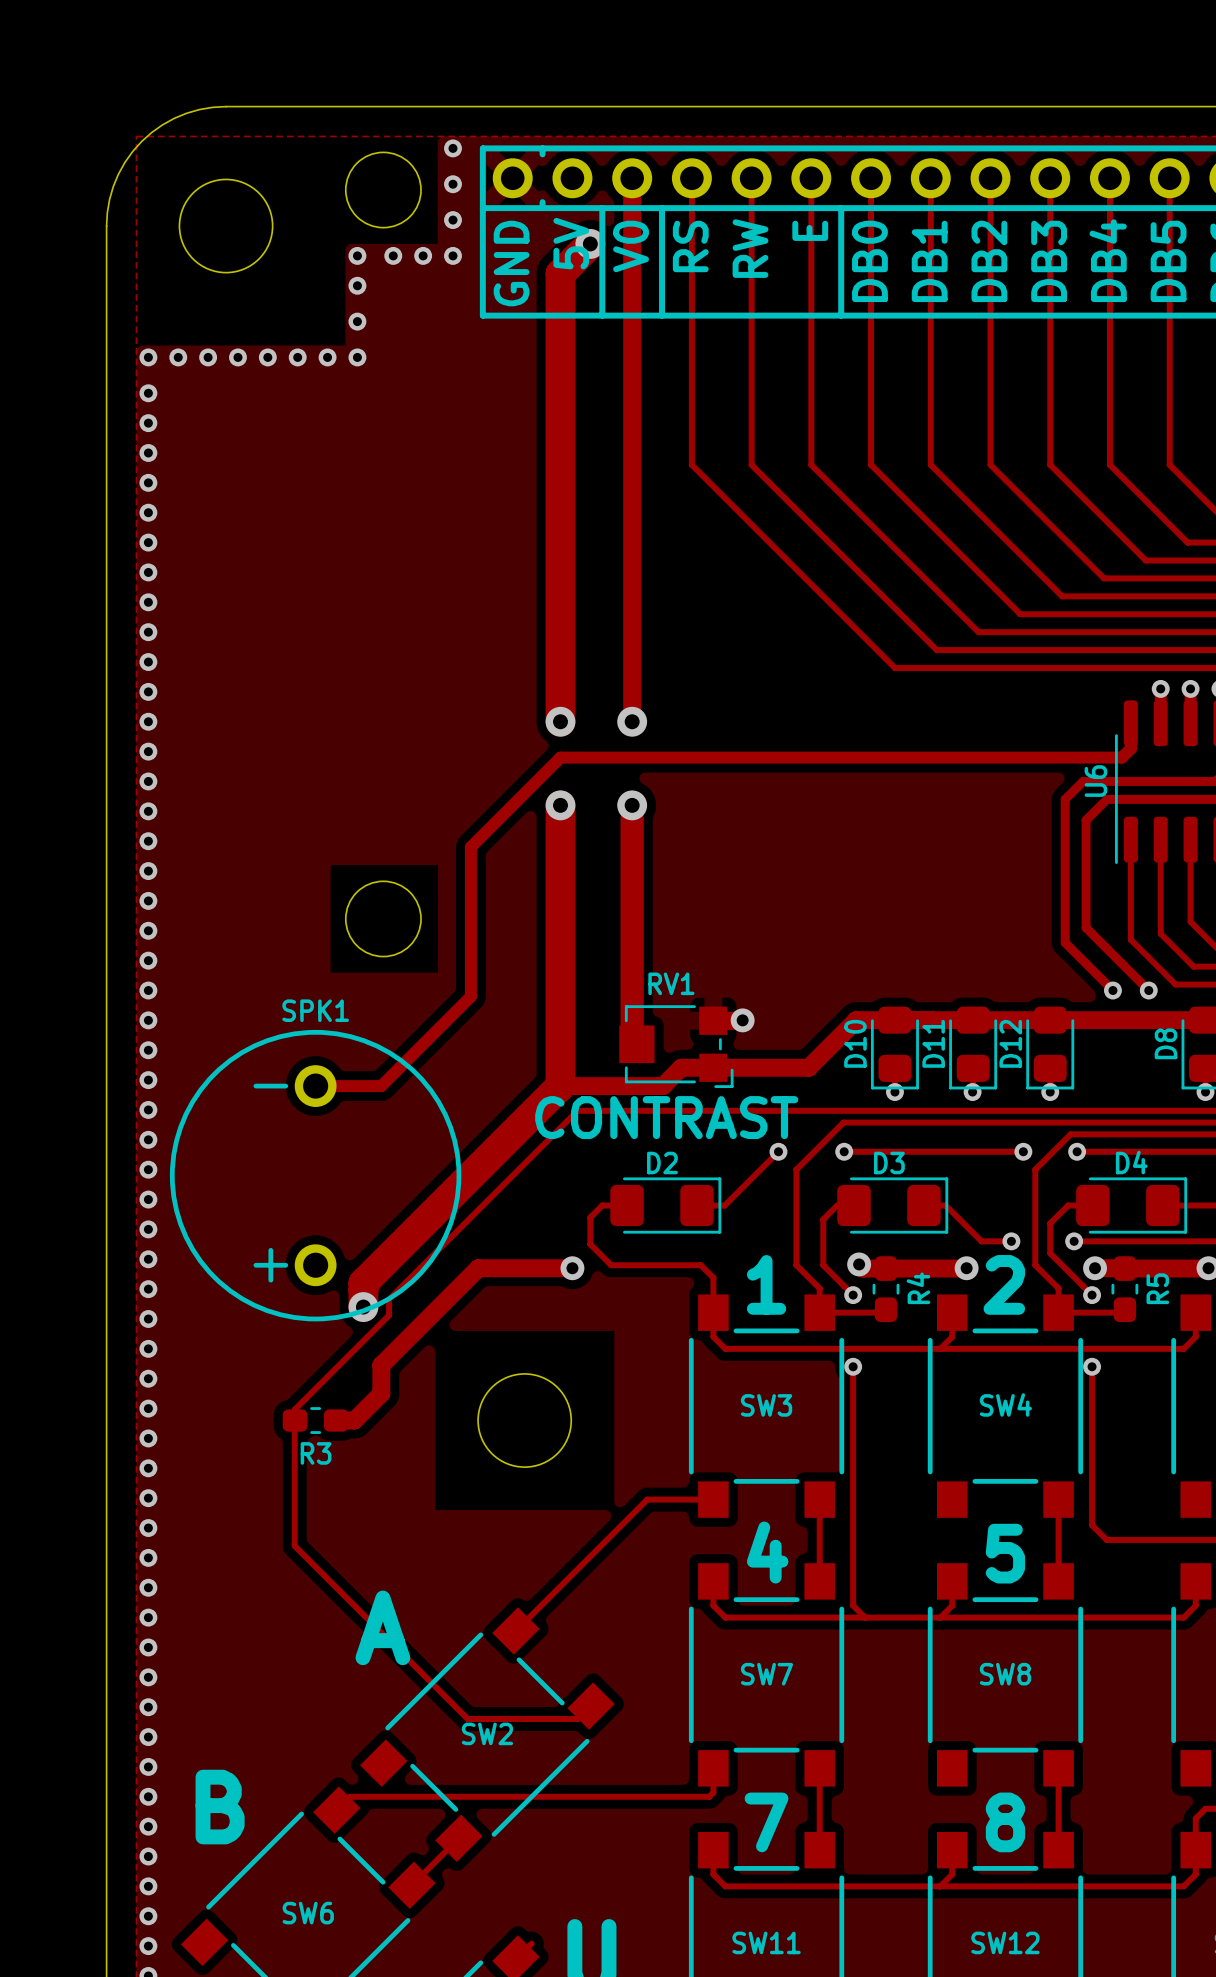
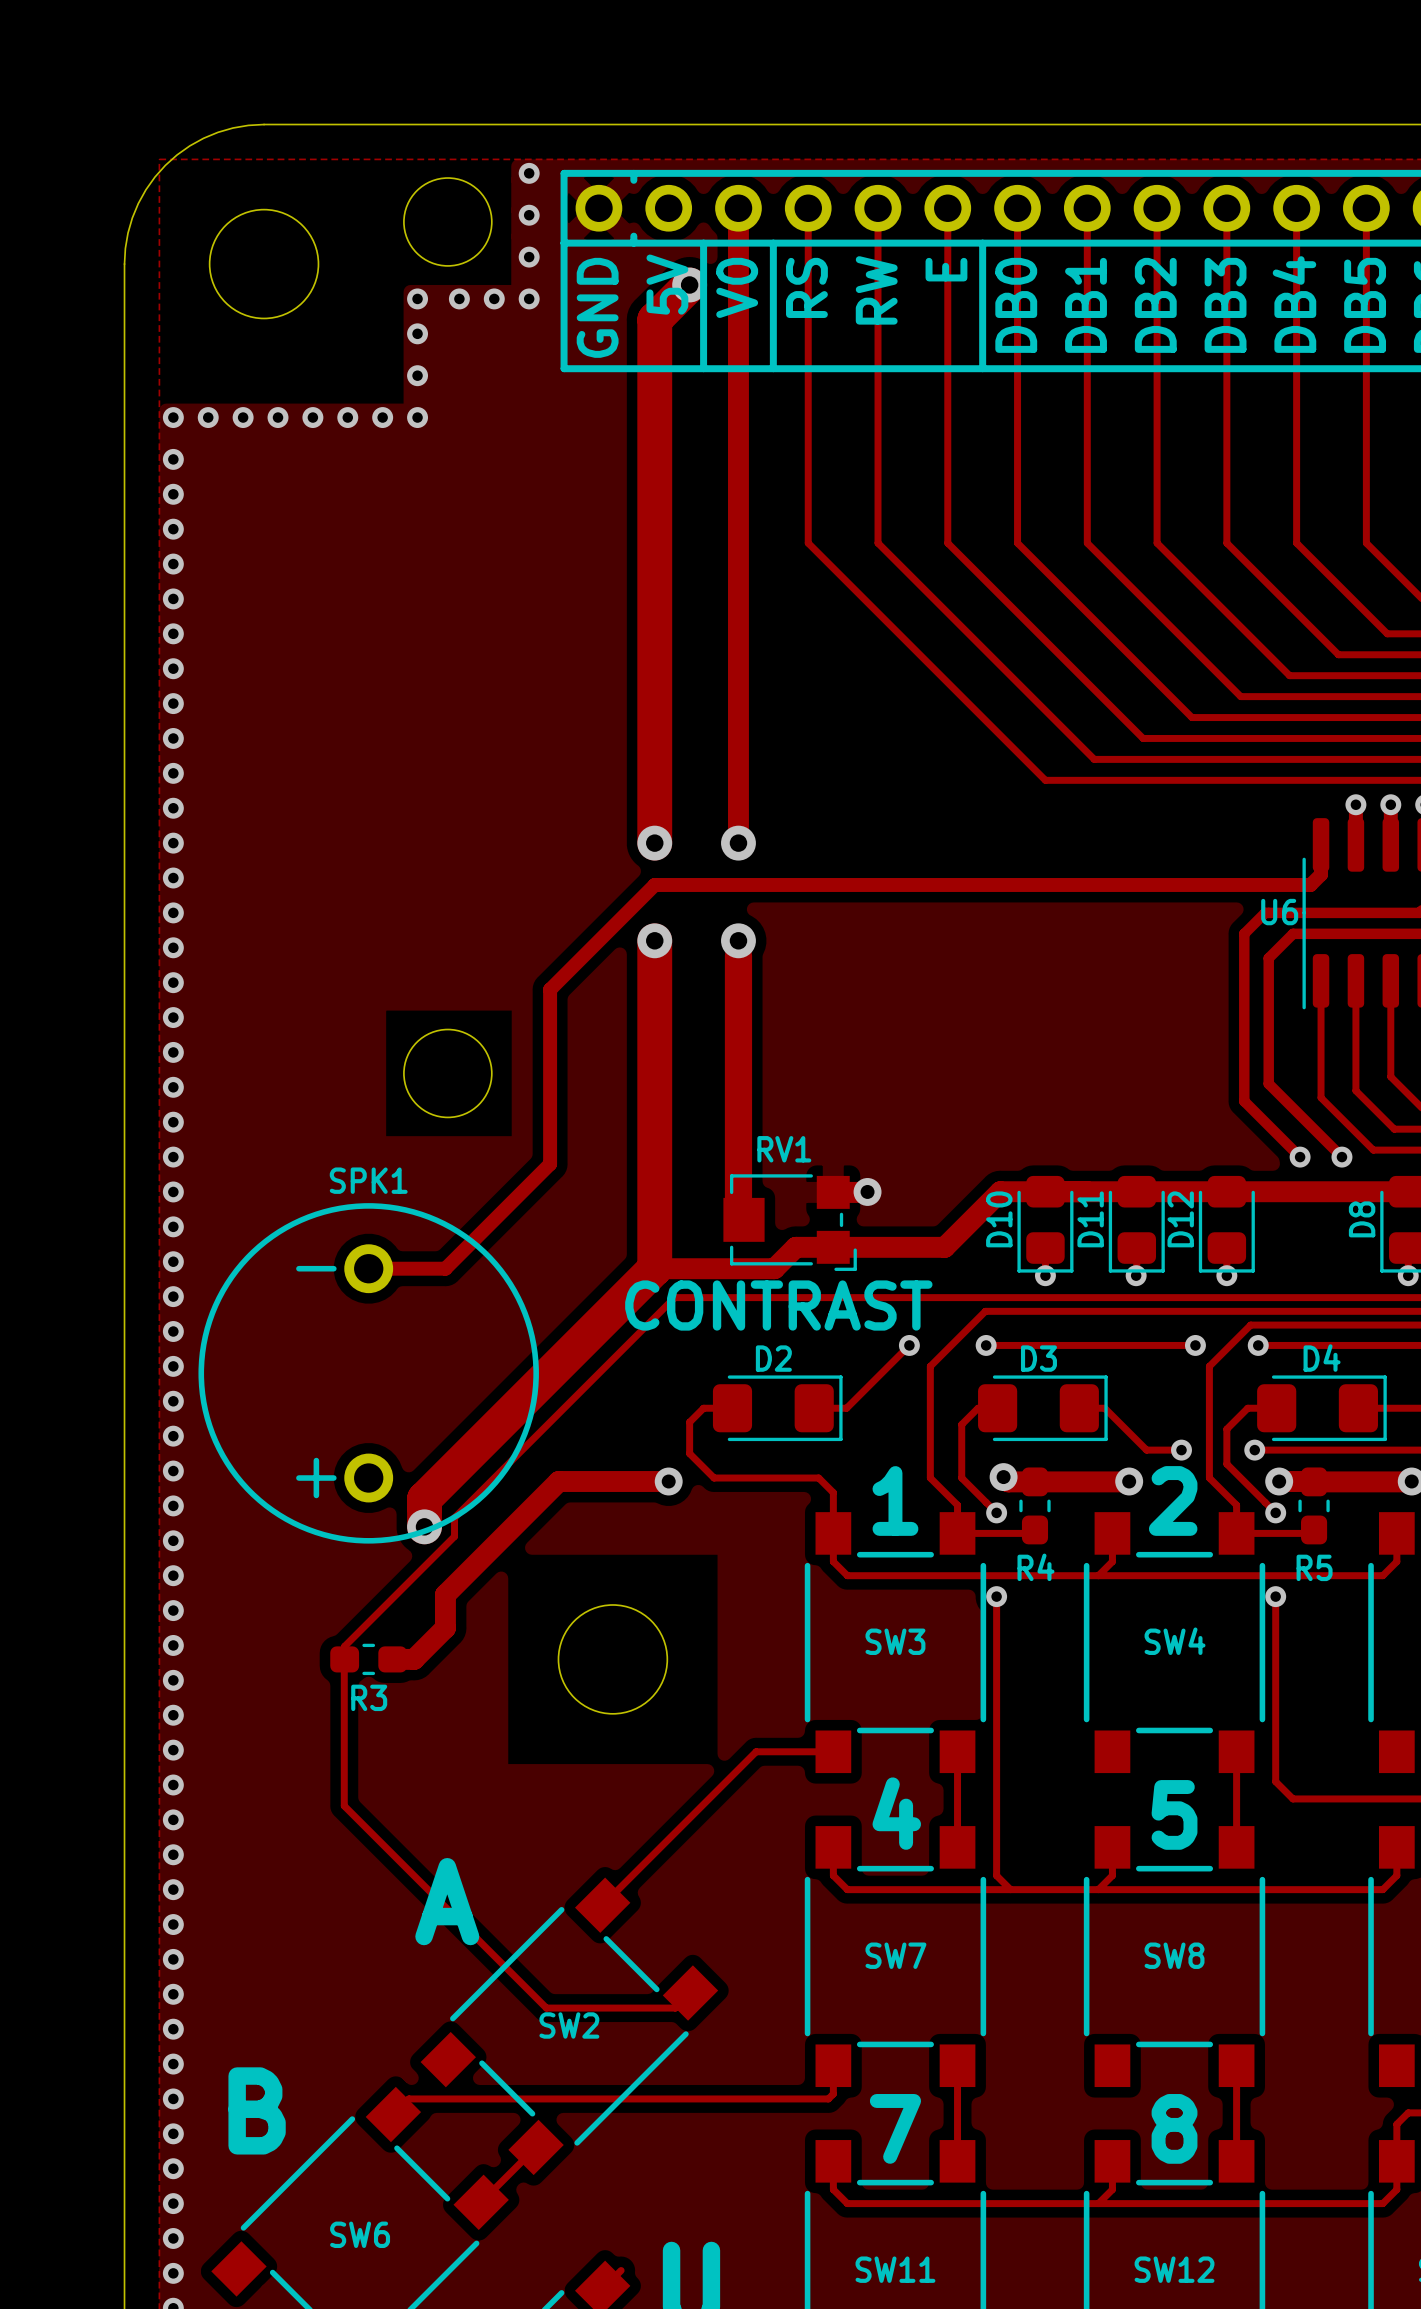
U6 name rotation: 0° (1095, 781) -> 90° clockwise (1279, 912)
R4 name rotation: 0° (918, 1288) -> 90° clockwise (1035, 1567)
R4 name position: R4 (918, 1288) -> R4 (1035, 1567)
R5 name rotation: 0° (1157, 1288) -> 90° clockwise (1314, 1567)
R5 name position: R5 (1157, 1288) -> R5 (1314, 1567)

